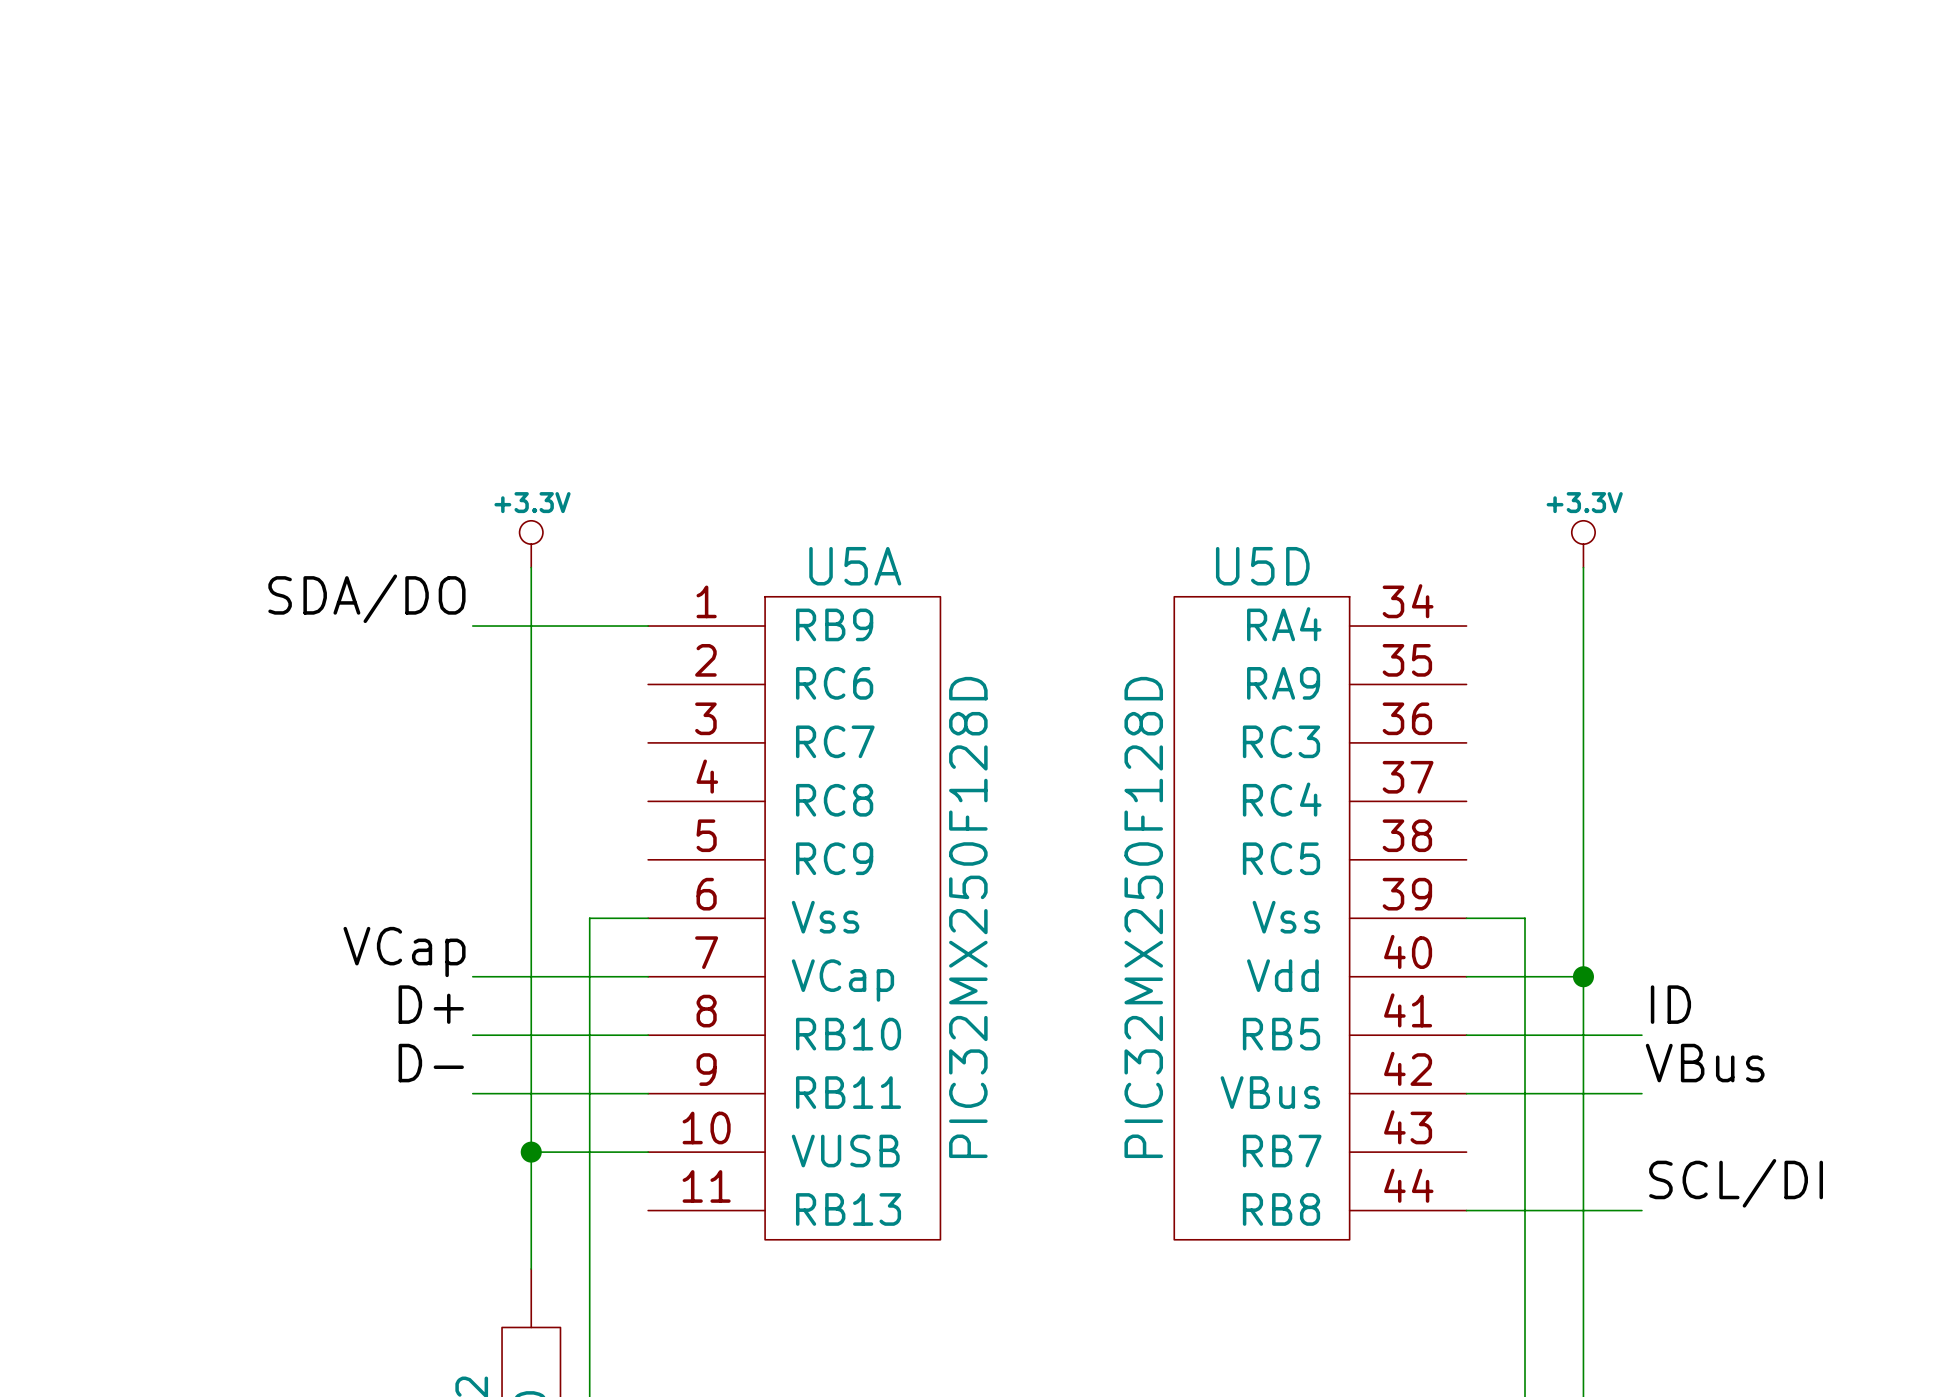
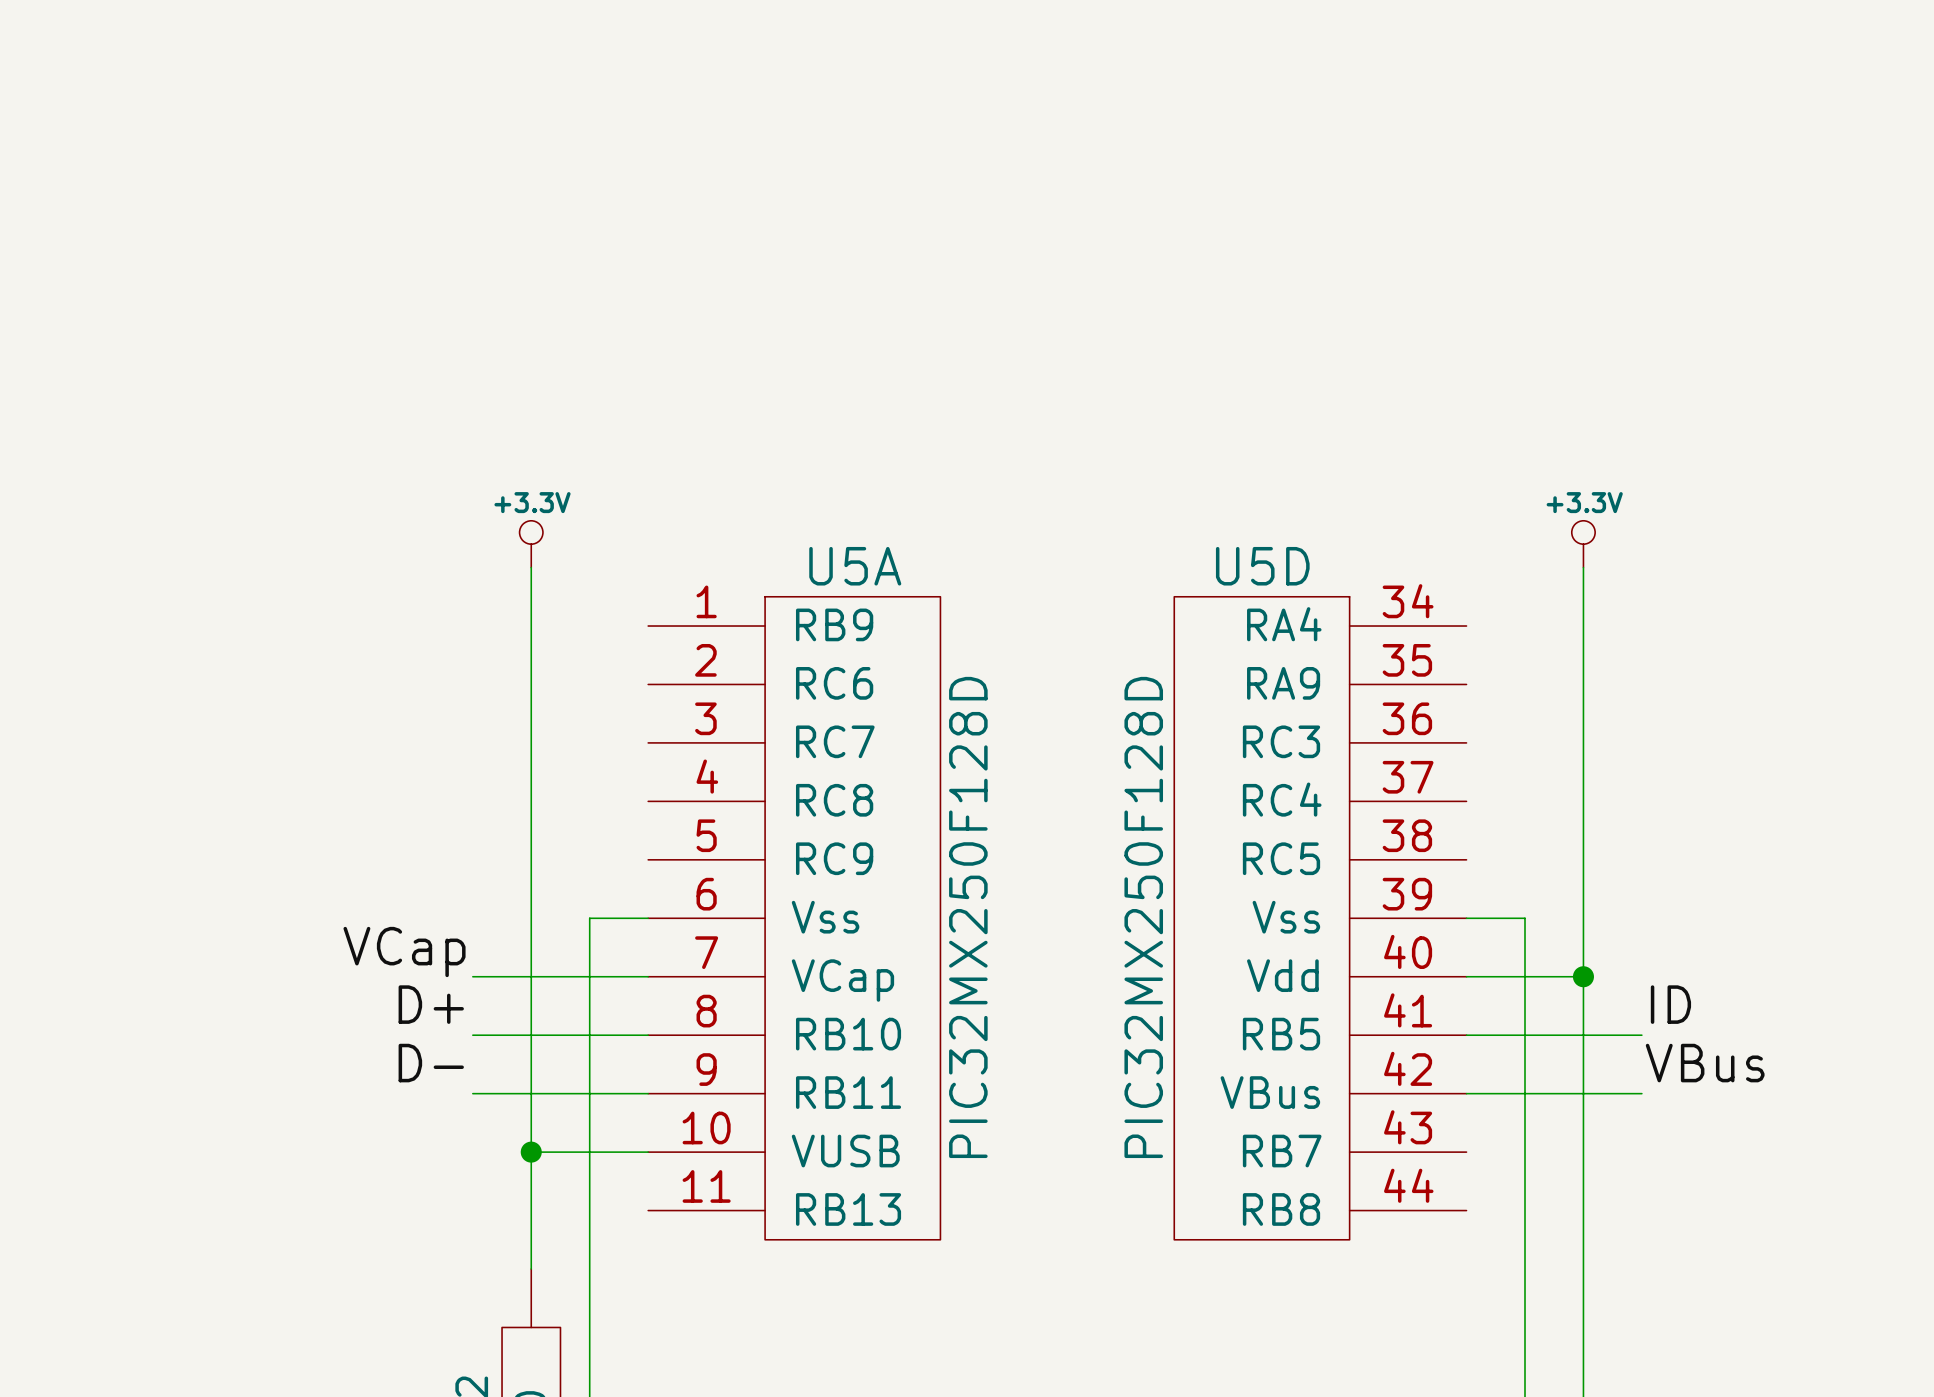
label: SDA/DO (366, 598) -> none
wire: (472, 626) (648, 626) -> none
label: SCL/DI (1736, 1183) -> none
wire: (1466, 1210) (1641, 1210) -> none

